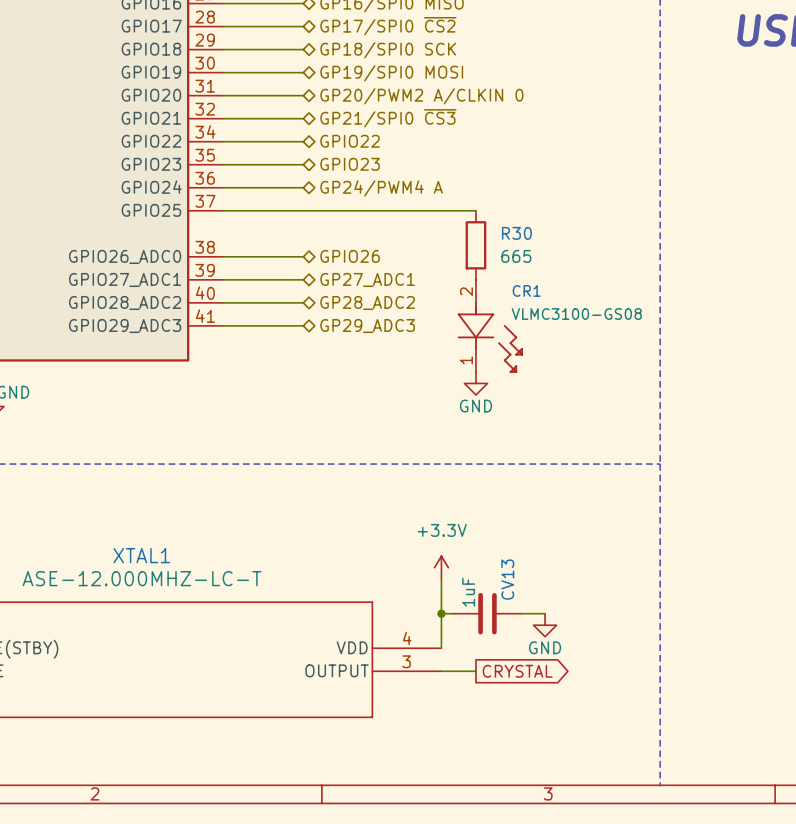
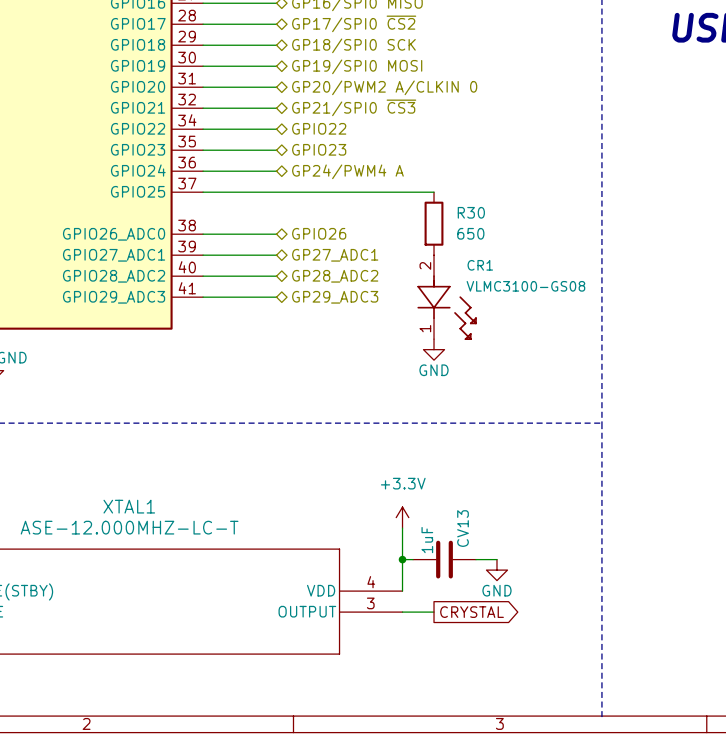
R30 value: 665 (516, 256) -> 650 (470, 233)

